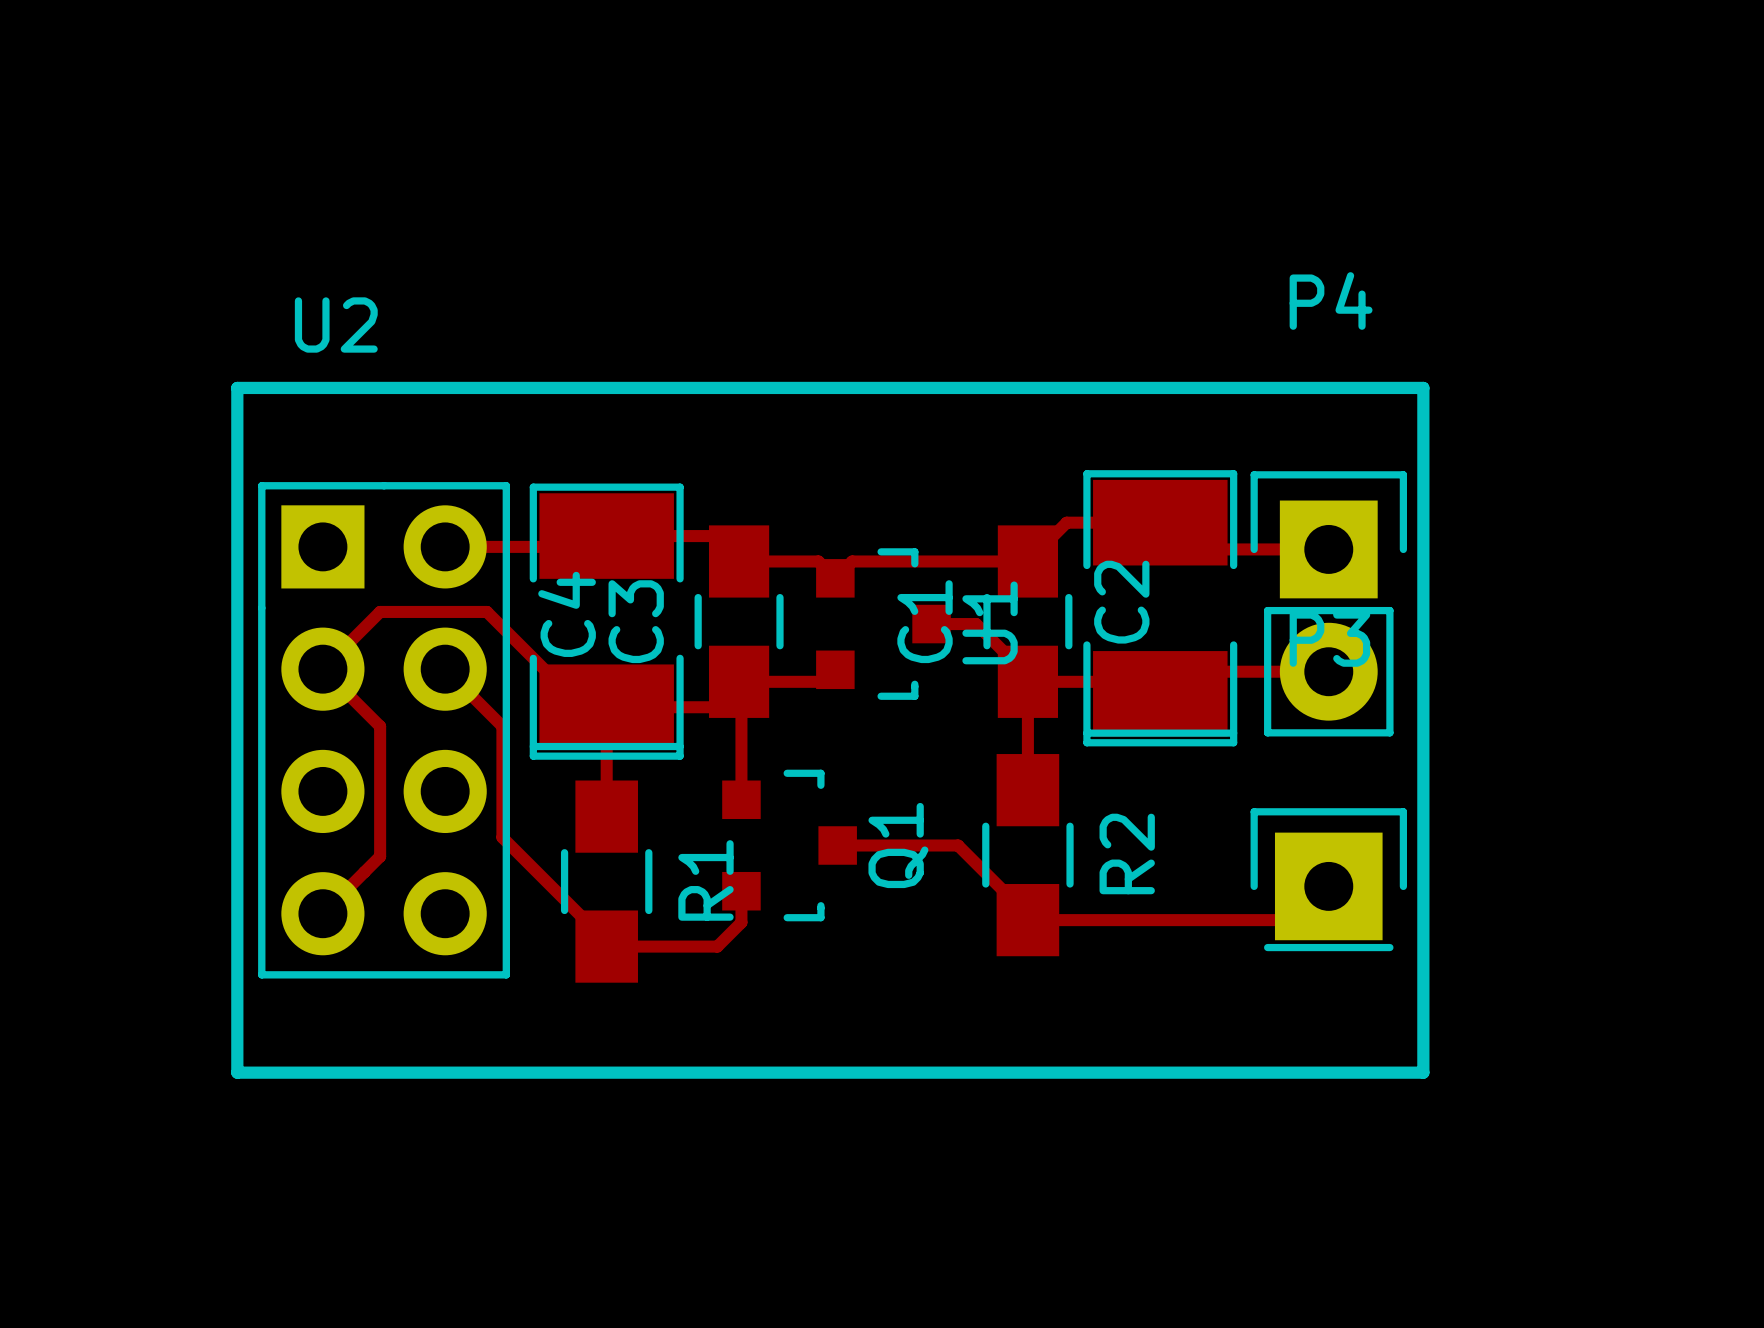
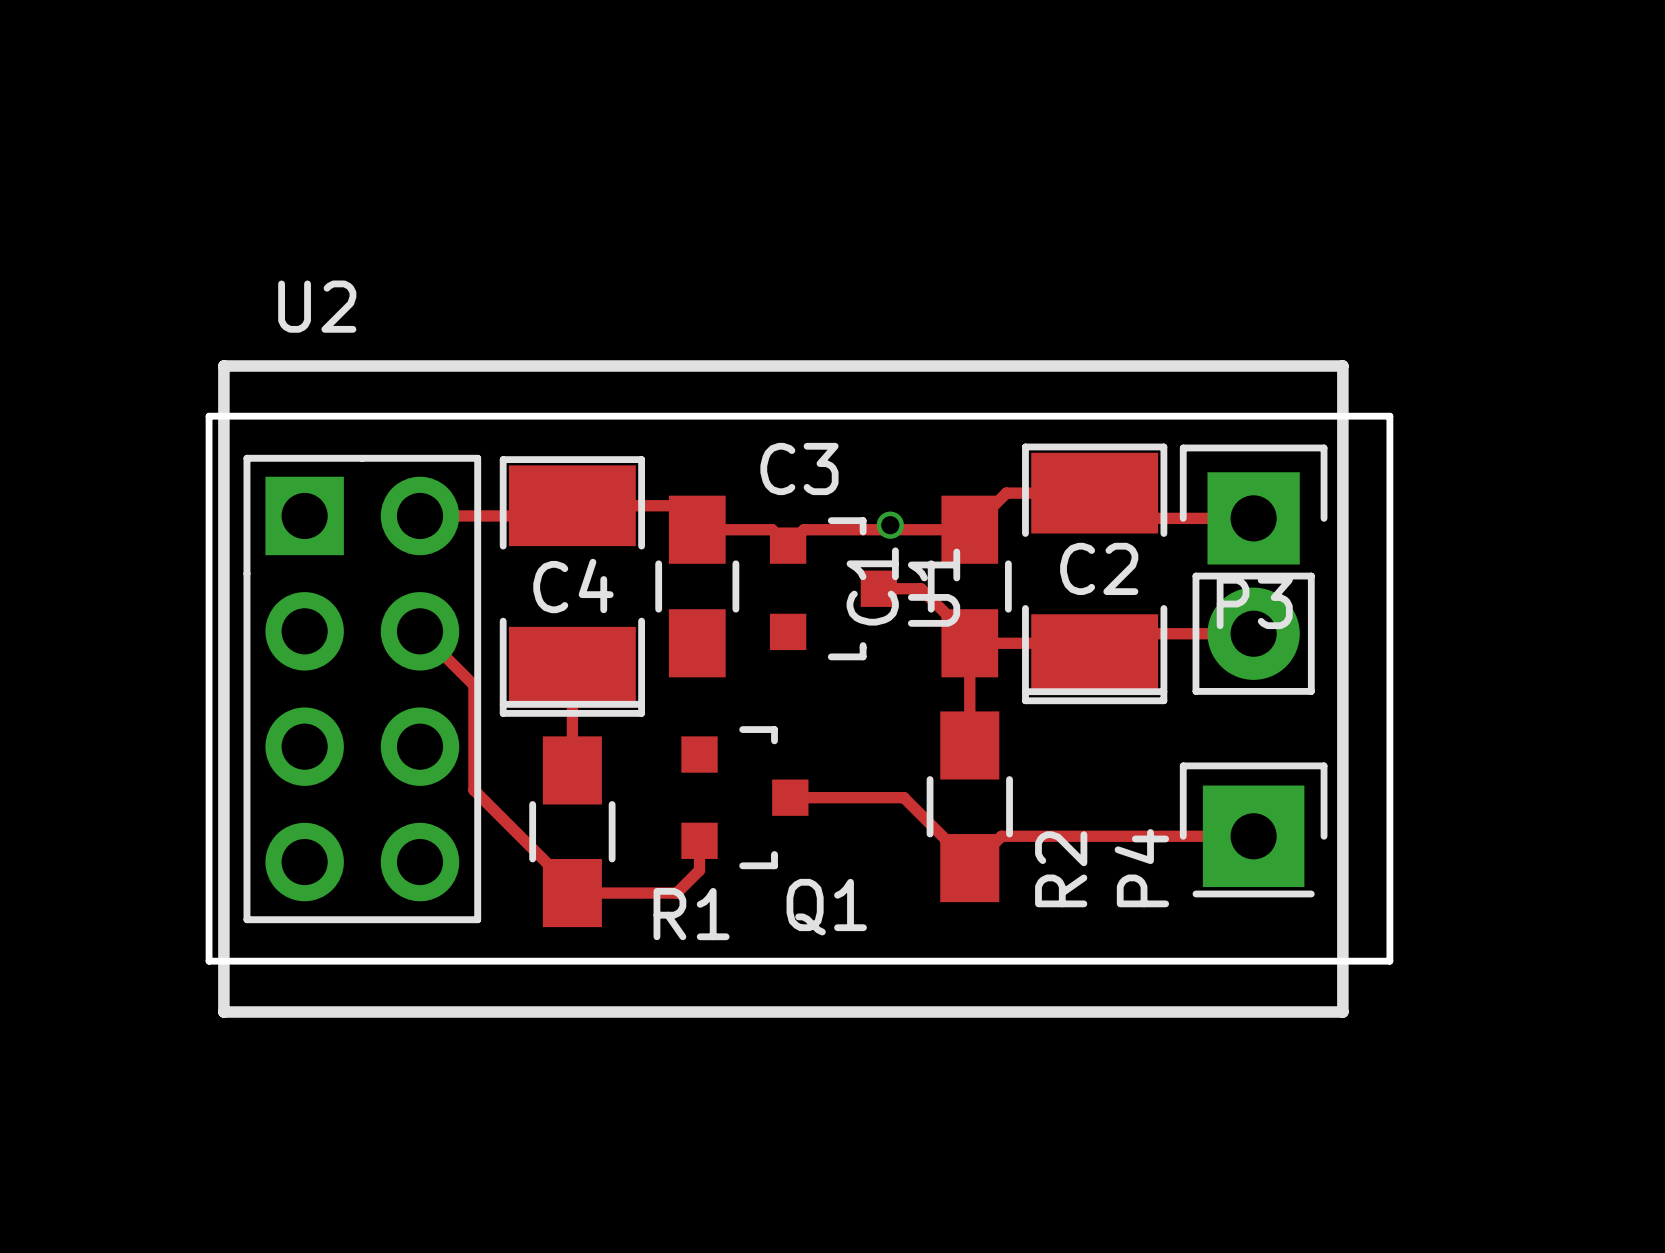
P4 name rotation: 0° (1331, 300) -> 90° counterclockwise (1141, 868)
P4 name position: P4 (1331, 300) -> P4 (1141, 868)
board edge: none -> (209, 416) (209, 961) (1389, 961) (1389, 416) (209, 416)
via: none -> (890, 525)
C2 name rotation: 0° (1121, 602) -> 90° clockwise (1099, 568)
C4 name rotation: 0° (567, 614) -> 90° clockwise (573, 585)
C3 name rotation: 0° (636, 621) -> 90° clockwise (799, 468)
C3 name position: C3 (636, 621) -> C3 (799, 468)
track: (835, 669) (823, 681) (739, 681) -> none
track: (739, 681) (741, 684) (741, 799) -> none
track: (739, 681) (713, 707) (582, 707) (486, 611) (380, 611) (322, 669) (380, 726) (380, 856) (322, 913) -> none
Q1 name rotation: 0° (898, 845) -> 90° clockwise (826, 907)
R2 name position: R2 (1127, 853) -> R2 (1061, 869)
R1 name rotation: 0° (705, 880) -> 90° clockwise (691, 914)
track: (1328, 886) (1295, 920) (1027, 920) -> (1253, 836) (1001, 836) (969, 868)

